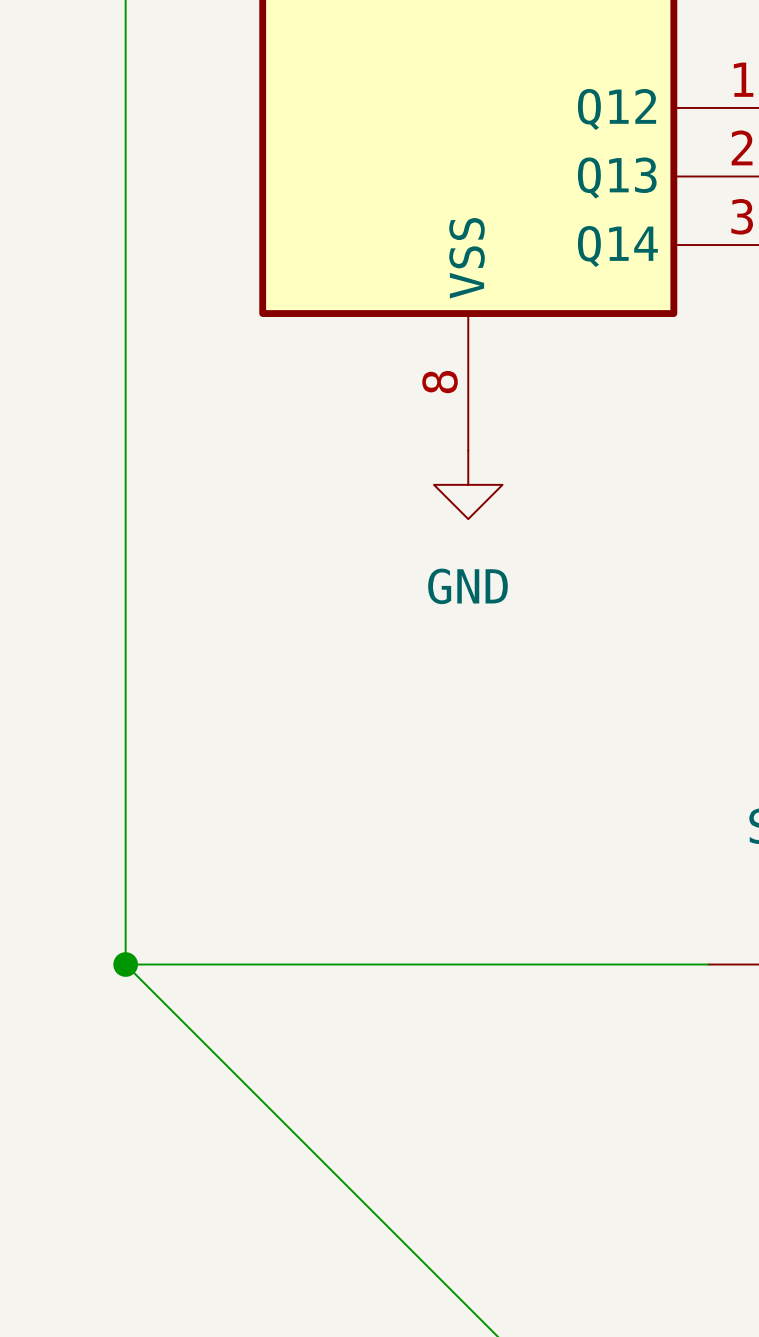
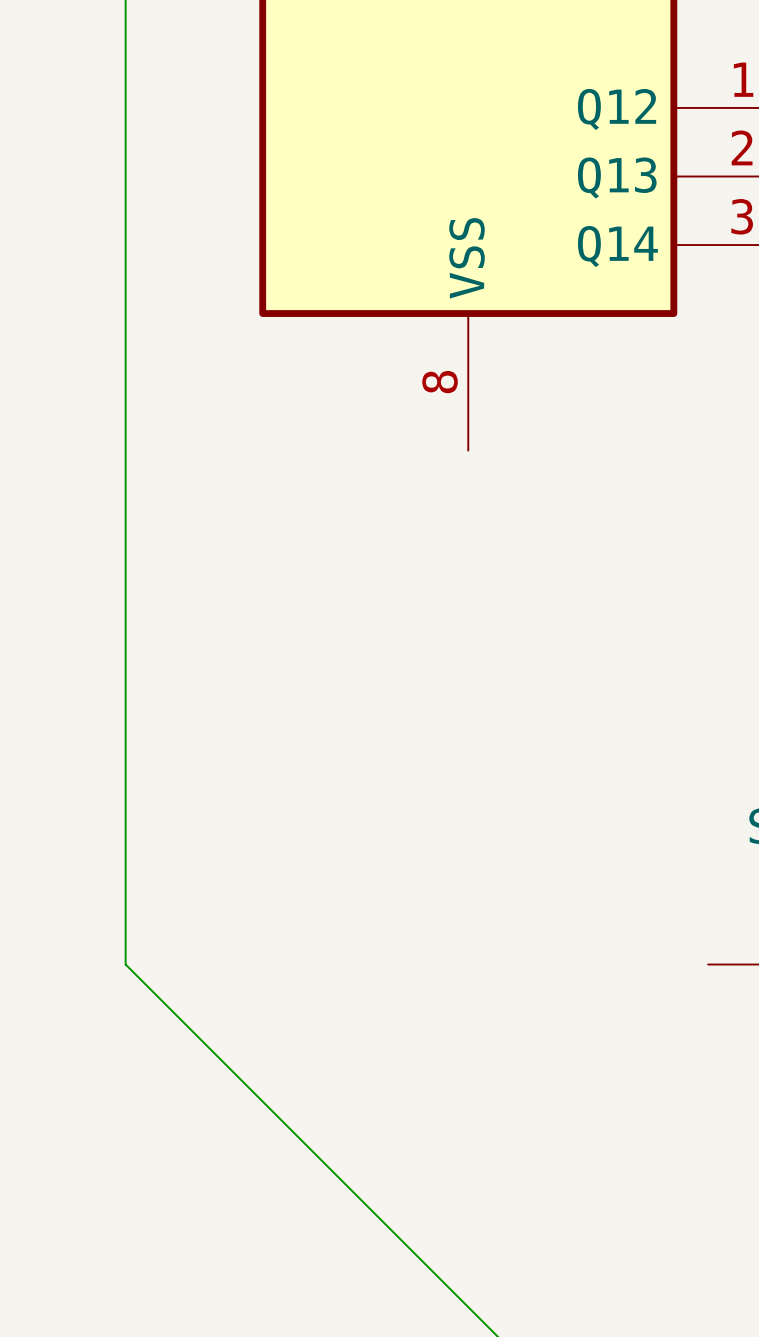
power symbol: GND (468, 484) -> none
wire: (125, 964) (708, 964) -> none
junction: (125, 964) -> none

